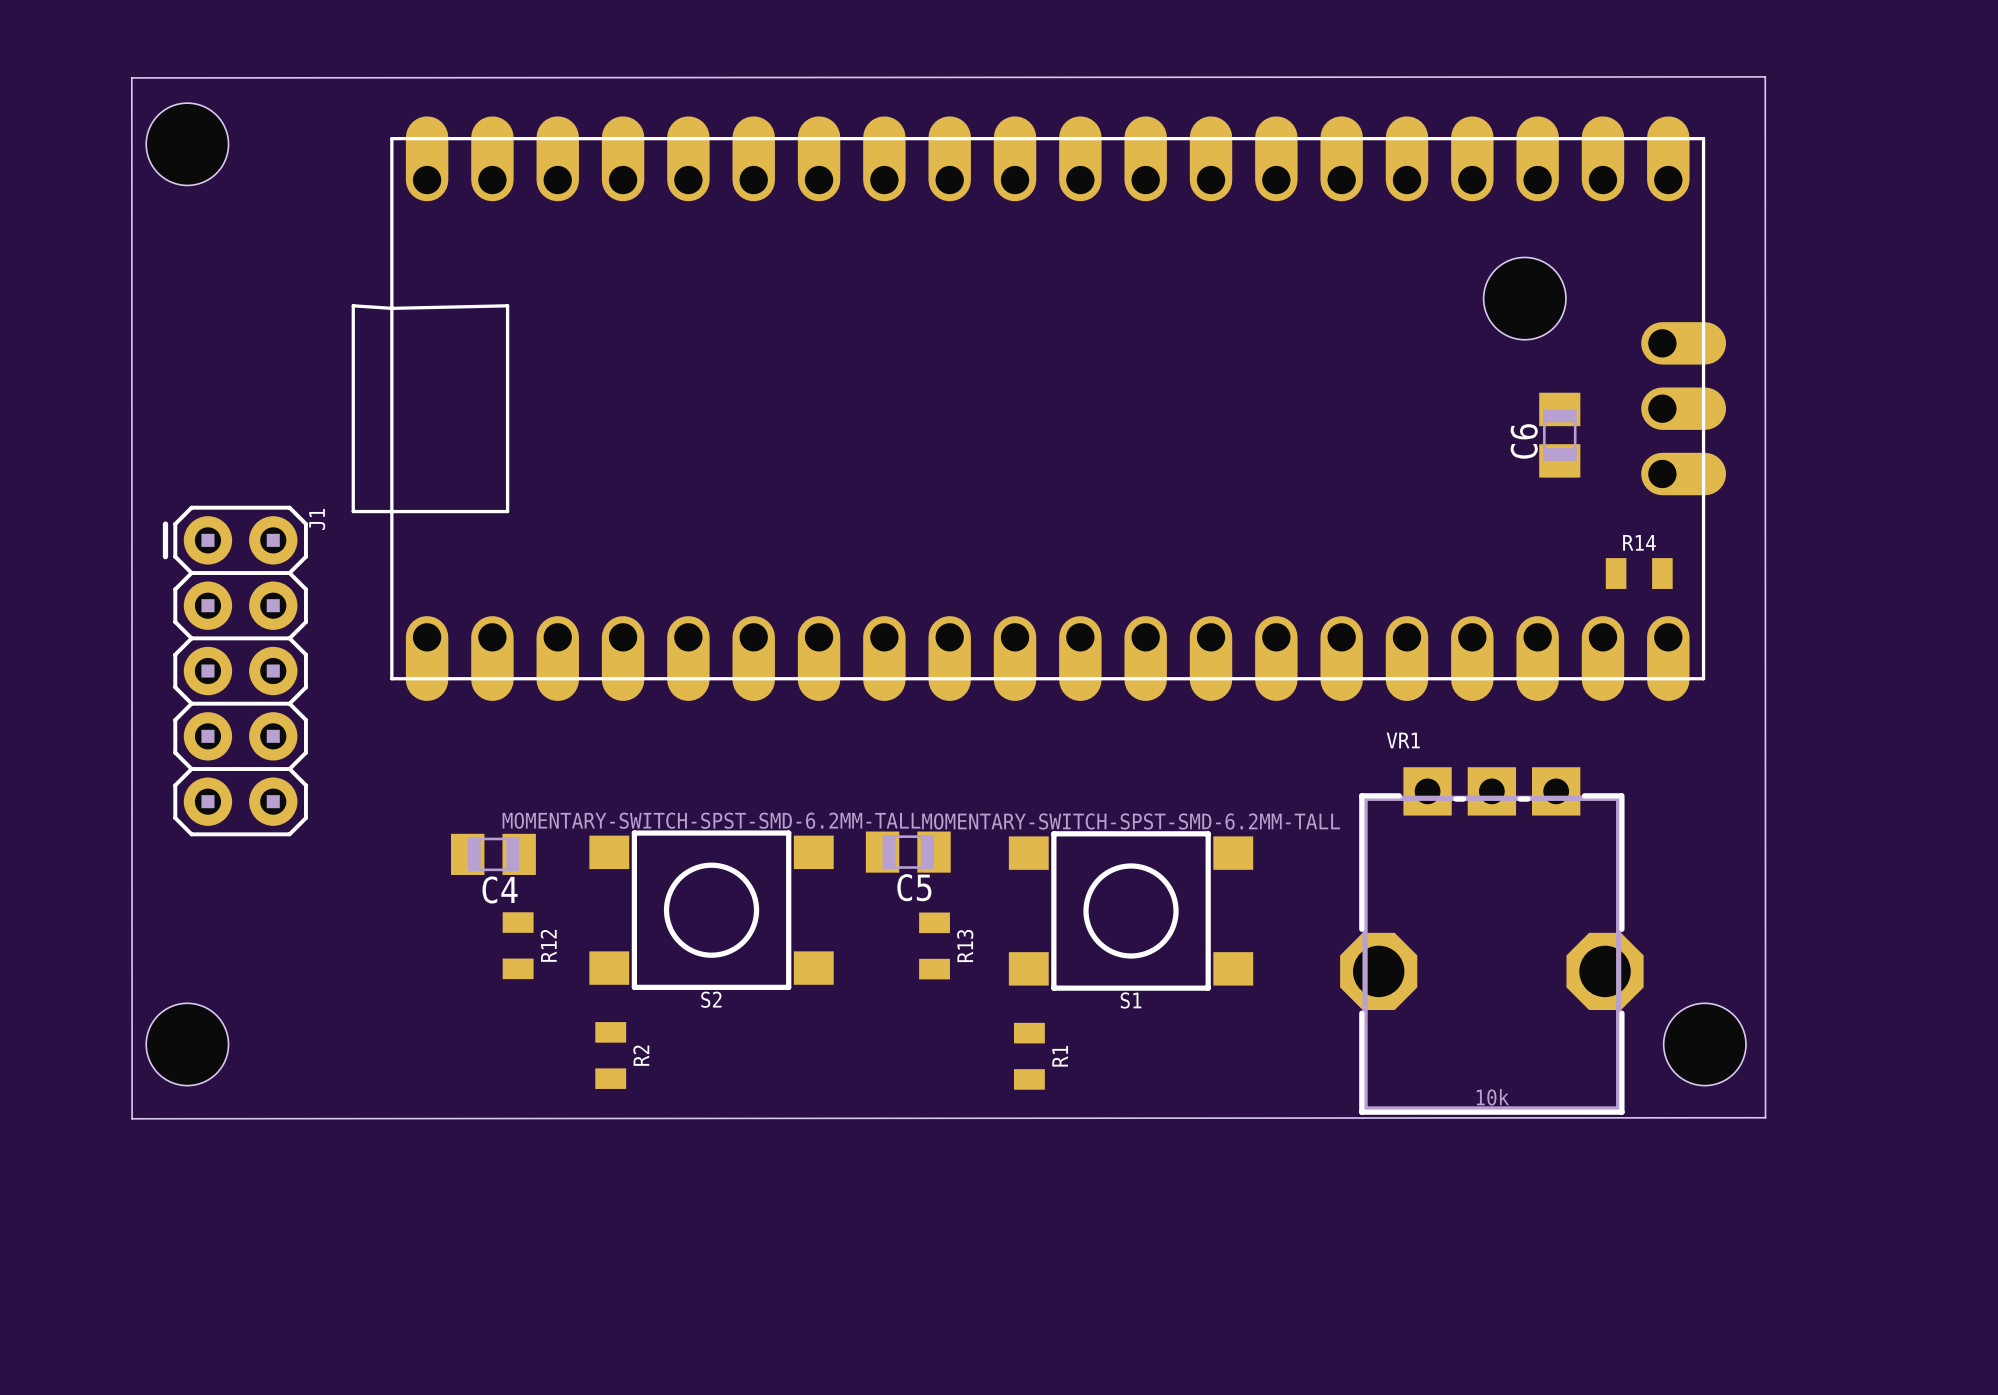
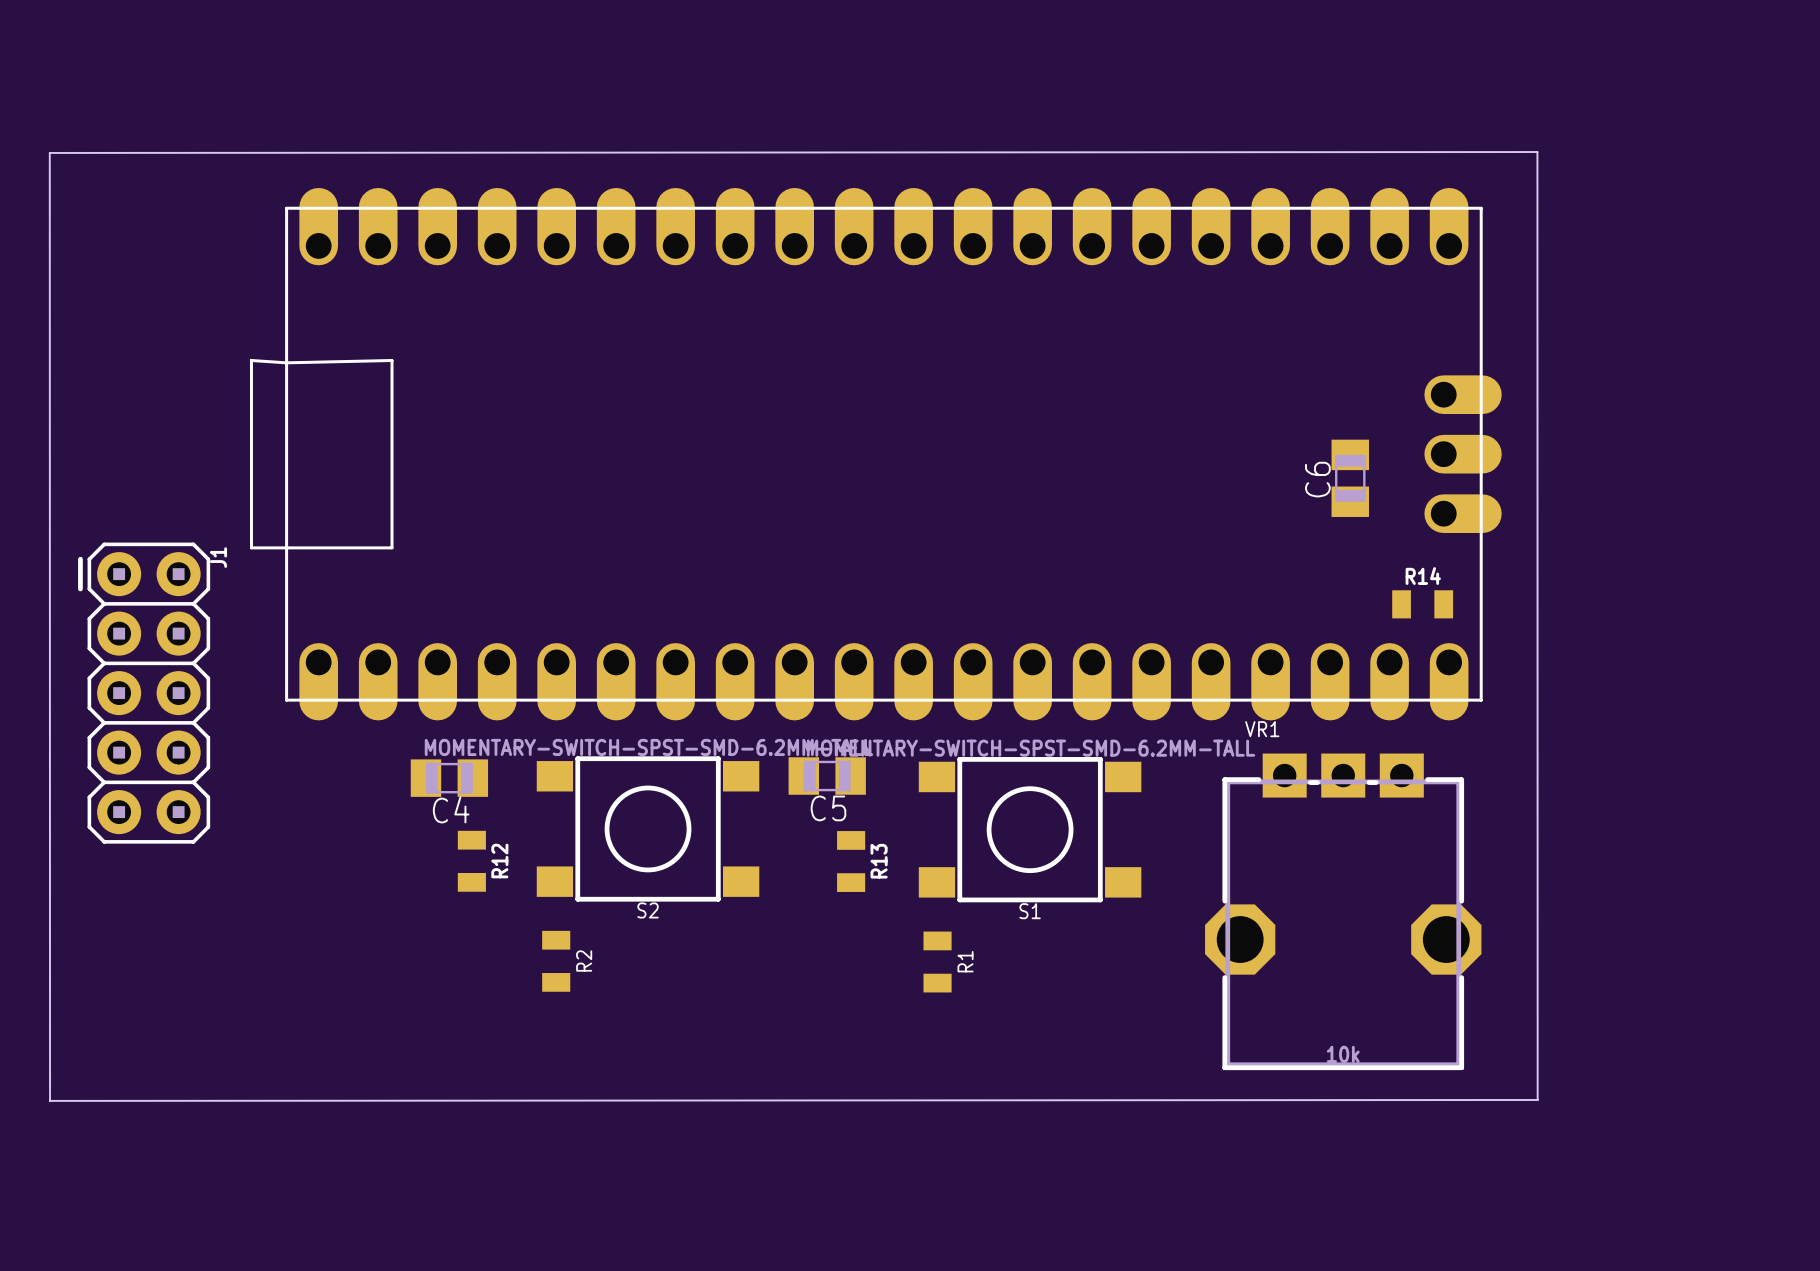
board edge: (1765, 76) (1765, 1117) (132, 1118) (131, 77) (1765, 76) -> (1537, 152) (49, 152) (50, 1100) (1537, 1099) (1537, 152)
hole: (187, 144) -> none
hole: (1524, 298) -> none
part position: (1038, 408) -> (875, 454)
C6 position: (1559, 435) -> (1350, 478)
R14 position: (1639, 573) -> (1422, 604)
J1 position: (235, 671) -> (144, 693)
VR1 position: (1491, 941) -> (1343, 911)
hole: (187, 1044) -> none
hole: (1704, 1044) -> none

